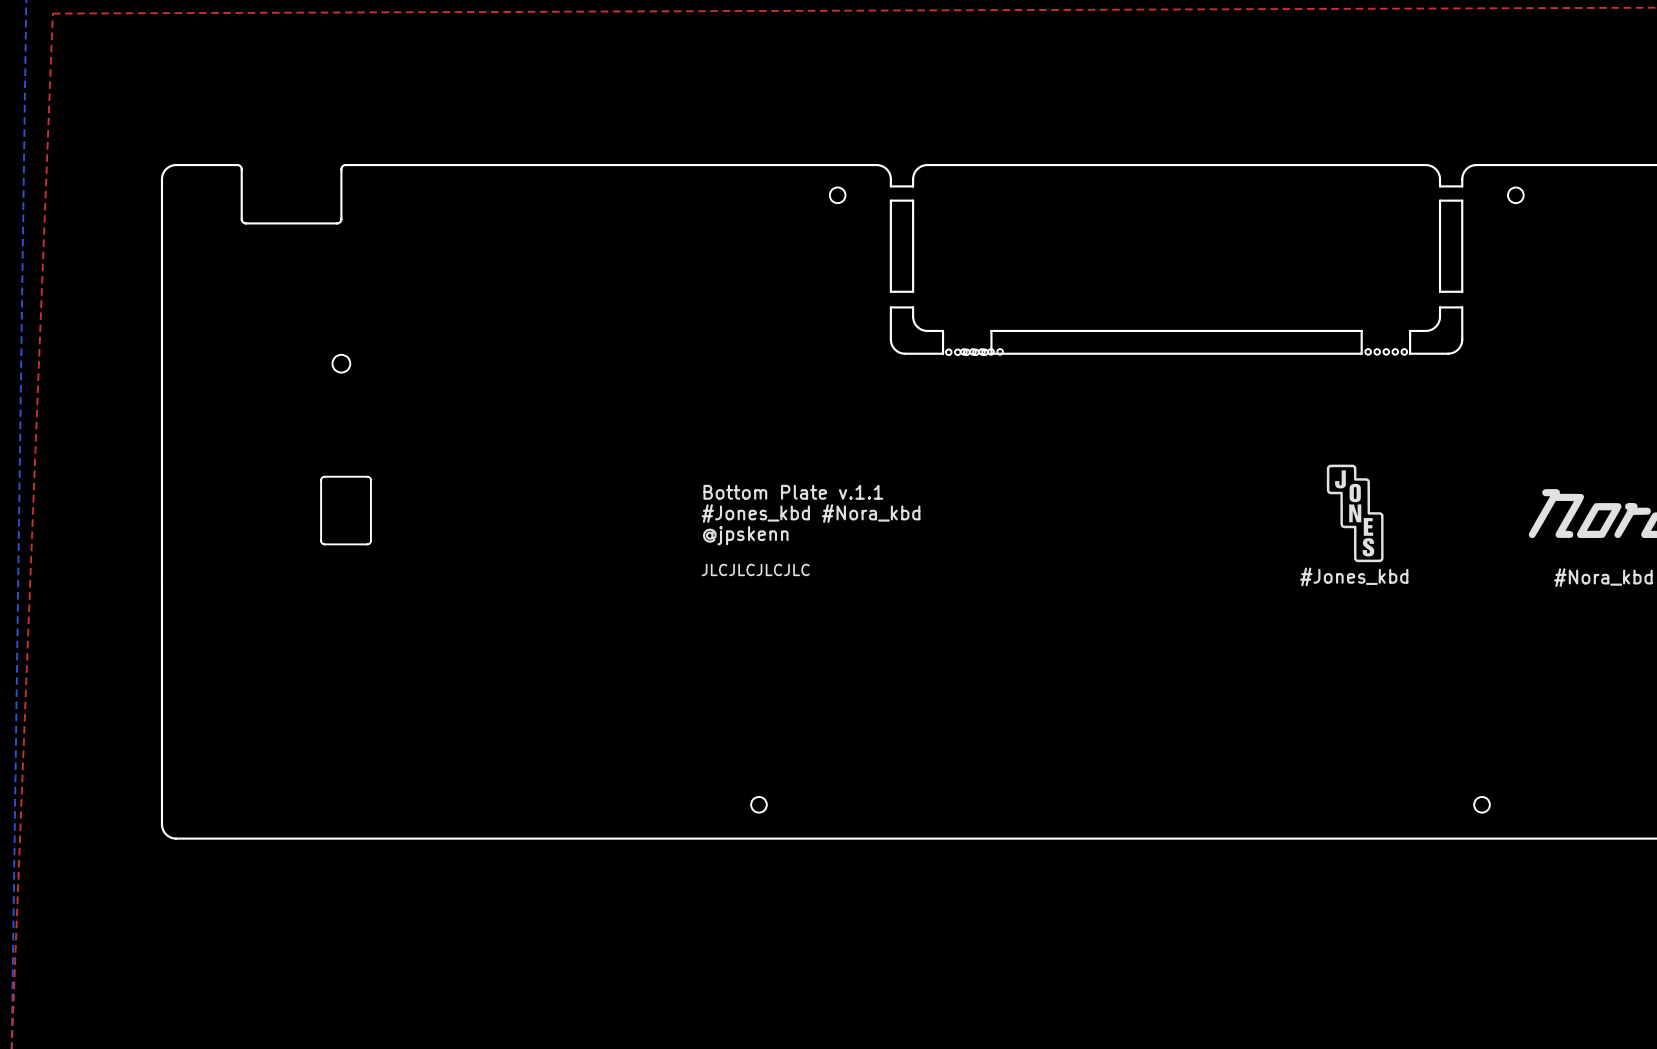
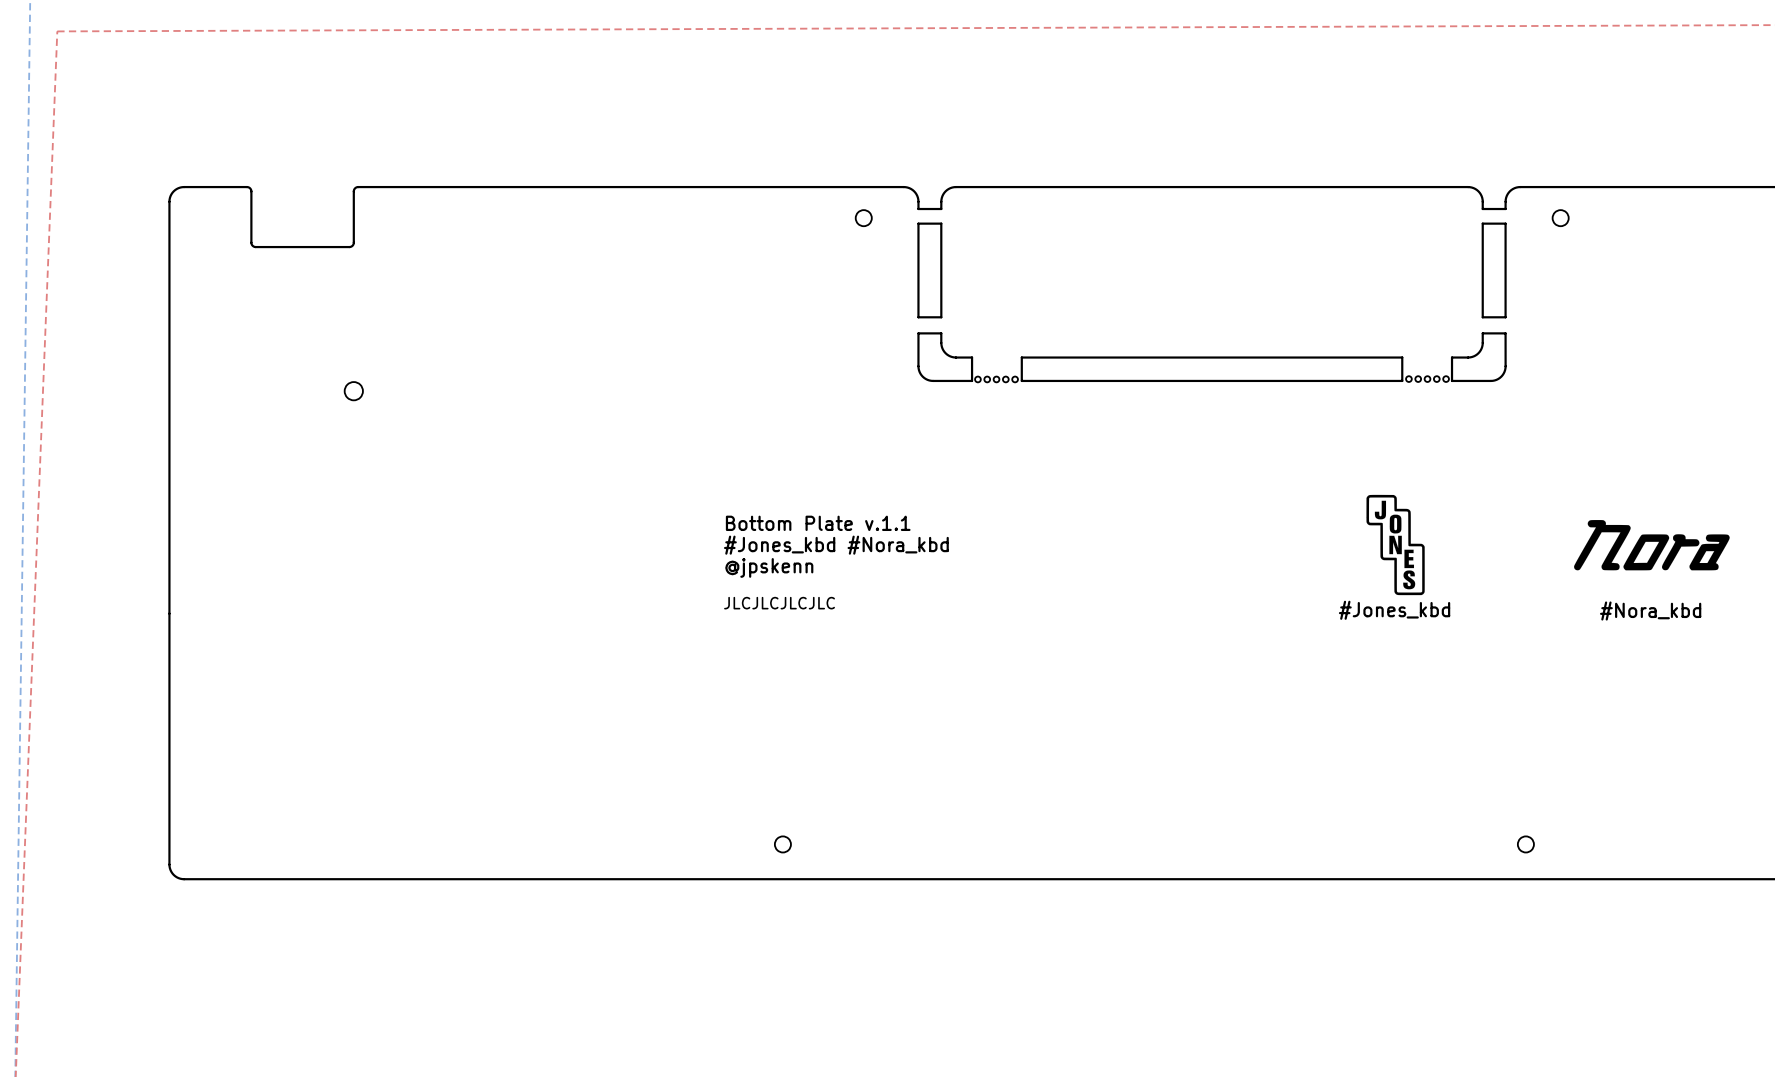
part: (982, 351) -> none
board edge: (324, 476) (367, 476) (370, 478) (370, 540) (369, 543) (324, 544) (321, 542) (321, 480) (324, 476) -> none

